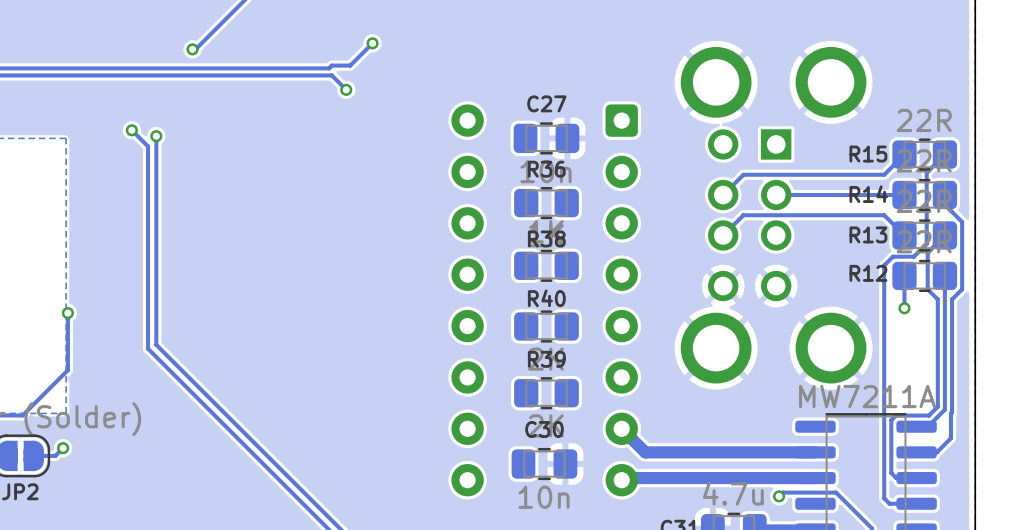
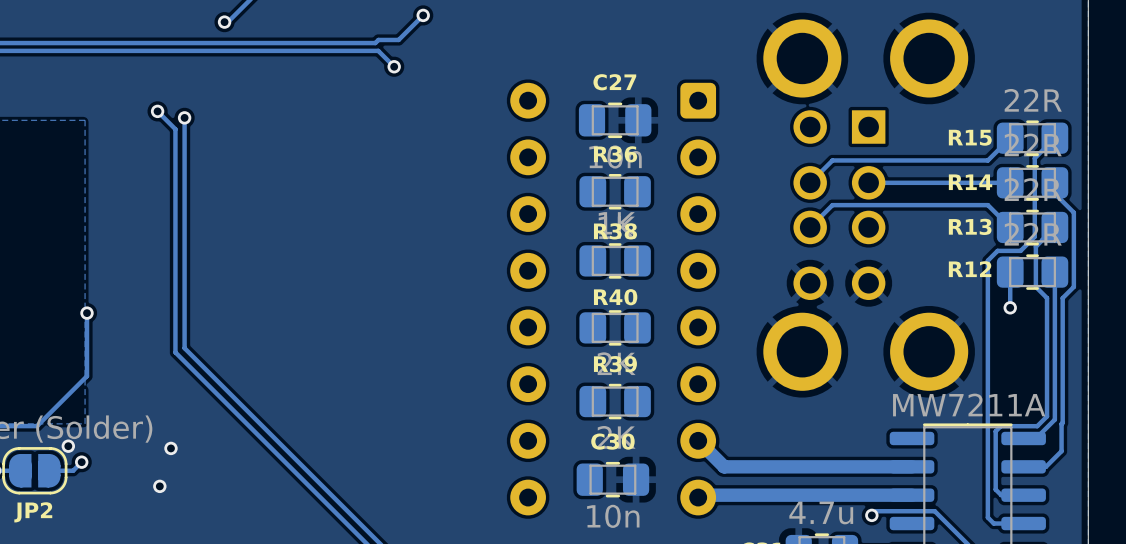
via: none -> (68, 446)
via: none -> (170, 448)
via: none -> (159, 486)

